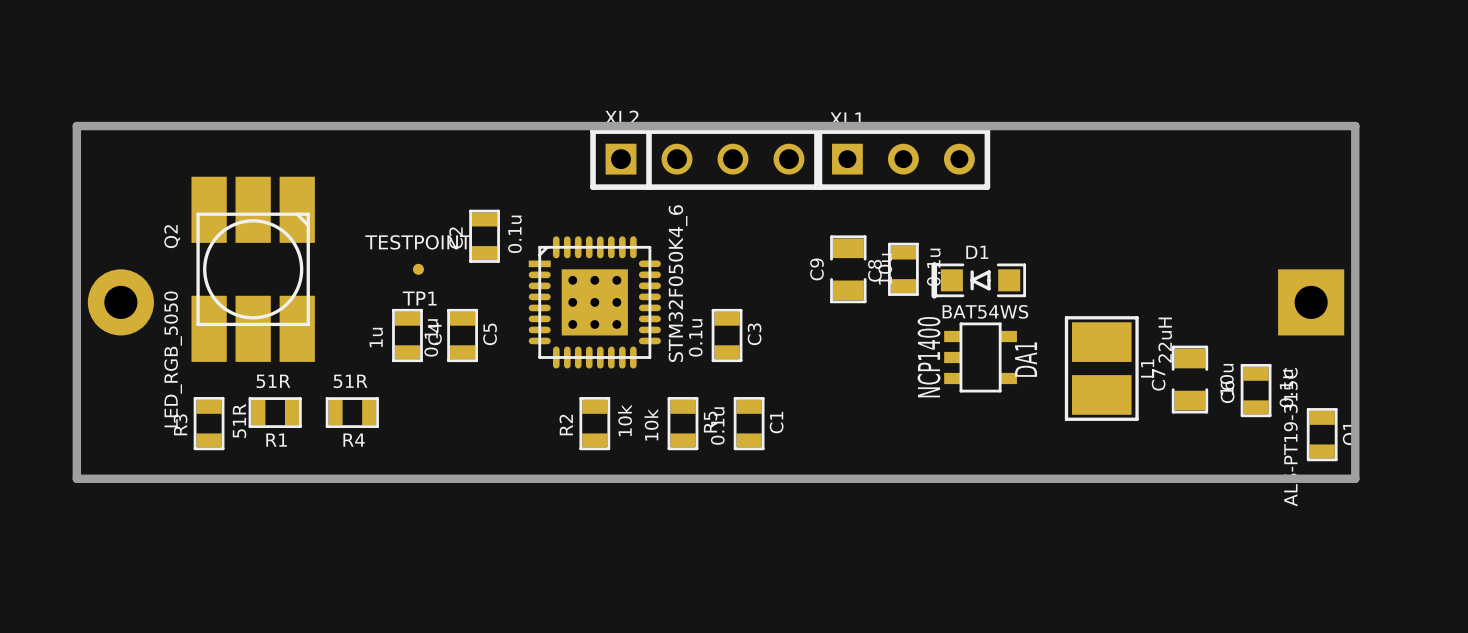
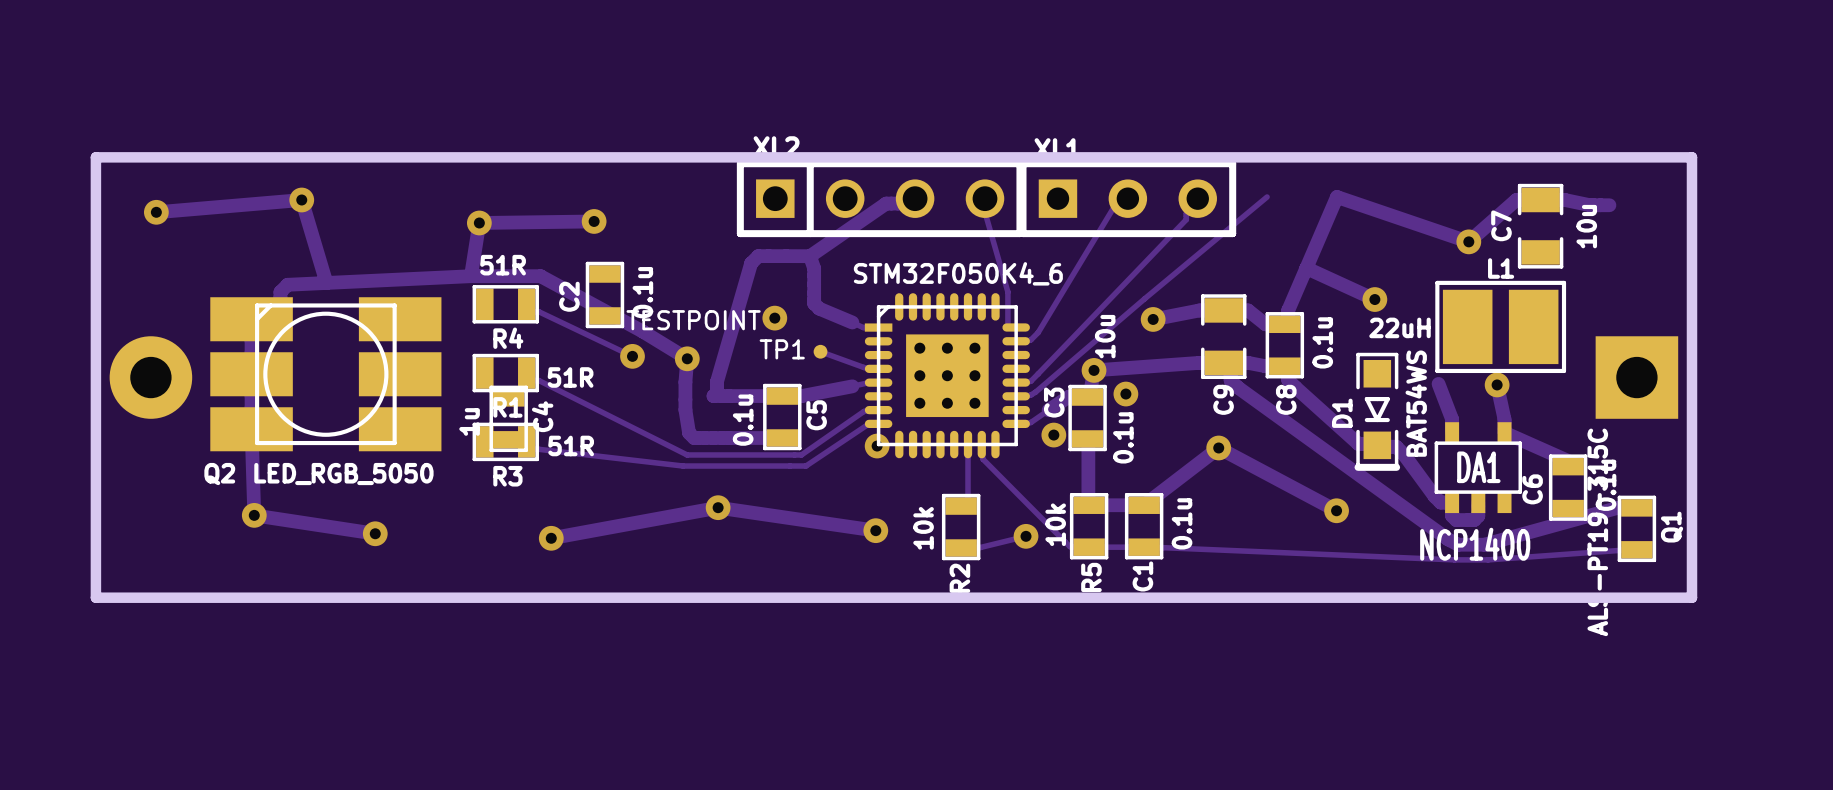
track: none -> (910, 196) (898, 203) (886, 203) (810, 256)
track: none -> (980, 196) (1007, 292) (1007, 327) (1016, 327)
track: none -> (1120, 196) (1038, 332) (1030, 339) (1016, 341)
track: none -> (1197, 196) (1186, 213) (1186, 219) (1038, 373) (1030, 381) (1016, 382)
track: none -> (1267, 196) (1035, 392) (1025, 396) (1016, 396)
via: none -> (301, 200)
track: none -> (1609, 205) (1590, 205) (1564, 200) (1516, 200) (1468, 241) (1336, 196) (1306, 268)
track: none -> (156, 212) (301, 200) (326, 282)
via: none -> (156, 212)
track: none -> (594, 221) (479, 222) (470, 276)
via: none -> (594, 221)
via: none -> (479, 222)
via: none -> (1468, 241)
track: none -> (810, 256) (758, 256) (751, 263) (716, 382) (716, 394) (713, 396) (801, 396) (868, 382) (878, 382)
track: none -> (810, 256) (814, 268) (814, 303) (819, 308) (863, 327) (878, 327)
track: none -> (1306, 268) (1288, 310) (1288, 322) (1284, 324) (1265, 324) (1248, 310) (1199, 310) (1153, 319)
track: none -> (1306, 268) (1374, 299)
track: none -> (470, 276) (287, 284) (280, 292) (280, 304) (251, 319) (251, 429) (254, 515) (375, 533)
track: none -> (470, 276) (540, 276) (642, 331) (687, 358) (685, 409) (689, 432) (694, 437) (782, 437)
Q2 name position: Q2 (172, 236) -> Q2 (219, 474)
via: none -> (1374, 299)
TP1 value position: TESTPOINT (418, 242) -> TESTPOINT (693, 320)
track: none -> (526, 304) (532, 311) (538, 311) (632, 356)
via: none -> (774, 318)
via: none -> (1153, 319)
Q2 rotation: 0° (253, 269) -> 90° counterclockwise (325, 374)
TP1 position: (418, 269) -> (820, 351)
C9 name position: C9 (816, 269) -> C9 (1223, 399)
C9 position: (848, 269) -> (1223, 336)
C8 position: (903, 269) -> (1284, 345)
C8 name position: C8 (874, 270) -> C8 (1286, 399)
D1 rotation: 0° (978, 280) -> 90° counterclockwise (1377, 411)
D1 position: (978, 280) -> (1377, 411)
track: none -> (820, 351) (863, 367) (878, 368)
part value rotation: 0° (678, 283) -> 90° clockwise (958, 273)
via: none -> (632, 356)
via: none -> (687, 358)
track: none -> (1223, 362) (1230, 368) (1230, 380) (1237, 387) (1448, 539) (1458, 544) (1484, 544) (1617, 507) (1636, 507)
via: none -> (1094, 370)
TP1 name position: TP1 (419, 298) -> TP1 (782, 349)
track: none -> (526, 373) (532, 380) (538, 380) (687, 454) (801, 454) (863, 411) (878, 410)
part position: (594, 302) -> (947, 375)
track: none -> (1438, 383) (1452, 419) (1452, 432)
track: none -> (1497, 384) (1504, 419) (1504, 432) (1576, 464)
via: none -> (1497, 384)
via: none -> (1125, 394)
C3 name position: C3 (754, 334) -> C3 (1054, 402)
C5 position: (462, 335) -> (782, 417)
C3 position: (727, 335) -> (1087, 418)
C3 value position: 0.1u (695, 337) -> 0.1u (1123, 437)
track: none -> (878, 423) (868, 423) (805, 466) (683, 466) (532, 449) (526, 441)
track: none -> (1016, 423) (1030, 422) (1068, 397) (1087, 397) (1090, 395) (1094, 370) (1199, 362) (1248, 362) (1265, 366) (1284, 366) (1288, 368) (1288, 380) (1358, 443) (1396, 446) (1434, 496) (1440, 502) (1452, 502) (1452, 515) (1456, 520) (1474, 520) (1478, 515) (1478, 502)
L1 value position: 22uH (1165, 340) -> 22uH (1400, 327)
via: none -> (1053, 435)
track: none -> (1087, 438) (1089, 505) (1144, 505) (1218, 447) (1336, 510)
track: none -> (968, 444) (968, 500) (961, 506)
track: none -> (981, 444) (983, 459) (1069, 546) (1163, 547) (1454, 559) (1488, 559) (1636, 549)
via: none -> (877, 446)
DA1 rotation: 0° (980, 357) -> 90° counterclockwise (1478, 467)
DA1 position: (980, 357) -> (1478, 467)
via: none -> (1218, 447)
Q2 value position: LED_RGB_5050 (173, 359) -> LED_RGB_5050 (343, 474)
DA1 name position: DA1 (1026, 359) -> DA1 (1478, 467)
L1 rotation: 0° (1101, 368) -> 90° clockwise (1500, 326)
L1 position: (1101, 368) -> (1500, 326)
L1 name position: L1 (1147, 368) -> L1 (1501, 268)
C7 position: (1189, 379) -> (1540, 226)
R1 value position: 51R (273, 381) -> 51R (570, 377)
via: none -> (718, 507)
via: none -> (1336, 510)
via: none -> (254, 515)
R1 position: (275, 412) -> (505, 373)
R4 position: (352, 412) -> (505, 304)
R2 value position: 10k (625, 420) -> 10k (923, 528)
R5 name position: R5 (710, 422) -> R5 (1091, 577)
C1 name position: C1 (776, 422) -> C1 (1142, 576)
R3 rotation: 0° (209, 423) -> 90° clockwise (505, 441)
R3 position: (209, 423) -> (505, 441)
R2 position: (594, 423) -> (961, 527)
R5 position: (682, 423) -> (1089, 526)
C1 position: (749, 423) -> (1144, 526)
R5 value position: 10k (651, 424) -> 10k (1055, 524)
R2 name position: R2 (566, 425) -> R2 (959, 578)
track: none -> (875, 530) (718, 507) (551, 538)
via: none -> (875, 530)
C1 value position: 0.1u (717, 426) -> 0.1u (1182, 523)
via: none -> (375, 533)
track: none -> (1026, 536) (980, 547) (961, 548)
via: none -> (1026, 536)
via: none -> (551, 538)
Q1 position: (1322, 434) -> (1636, 528)

